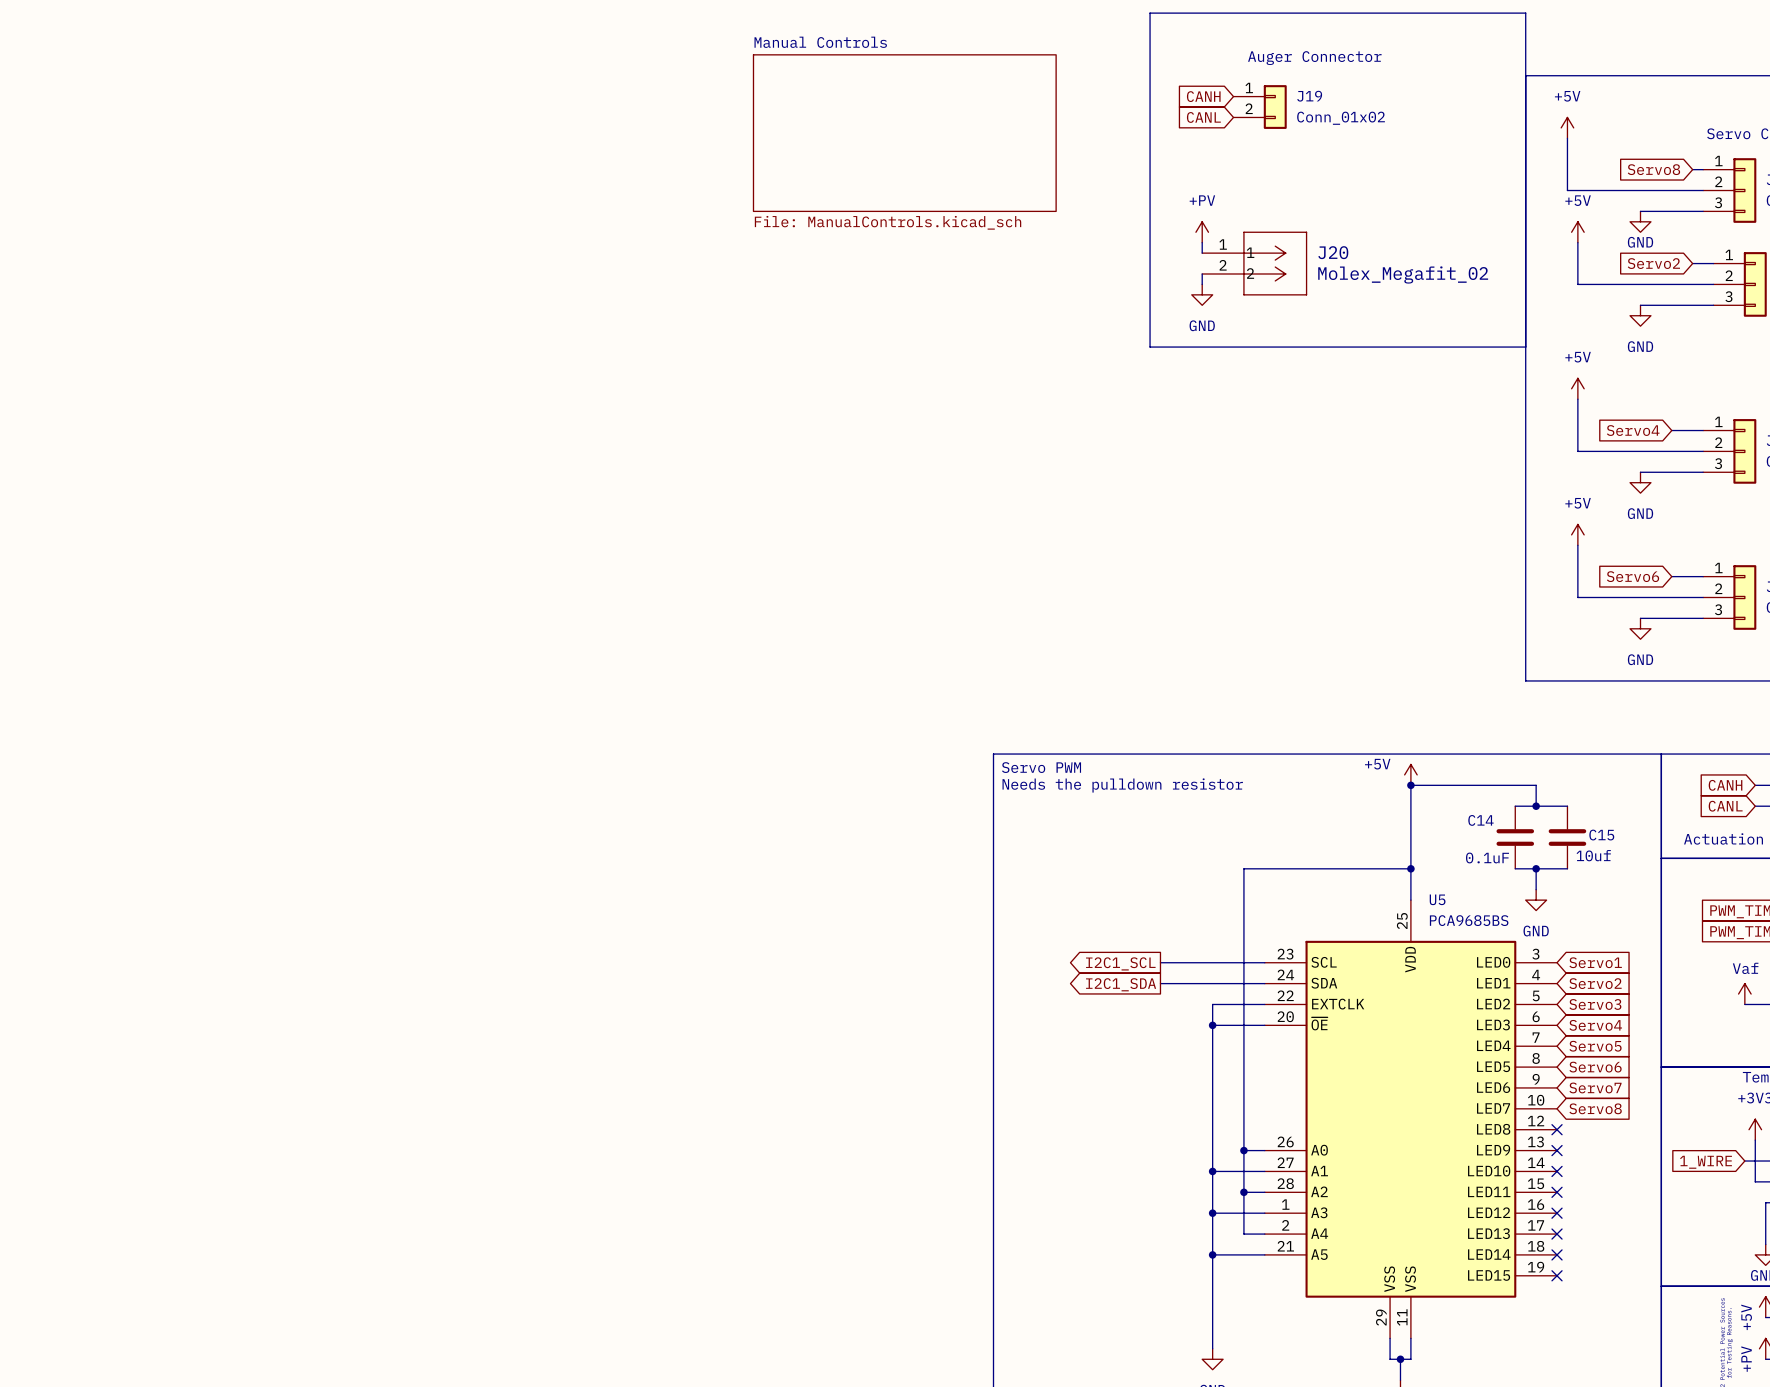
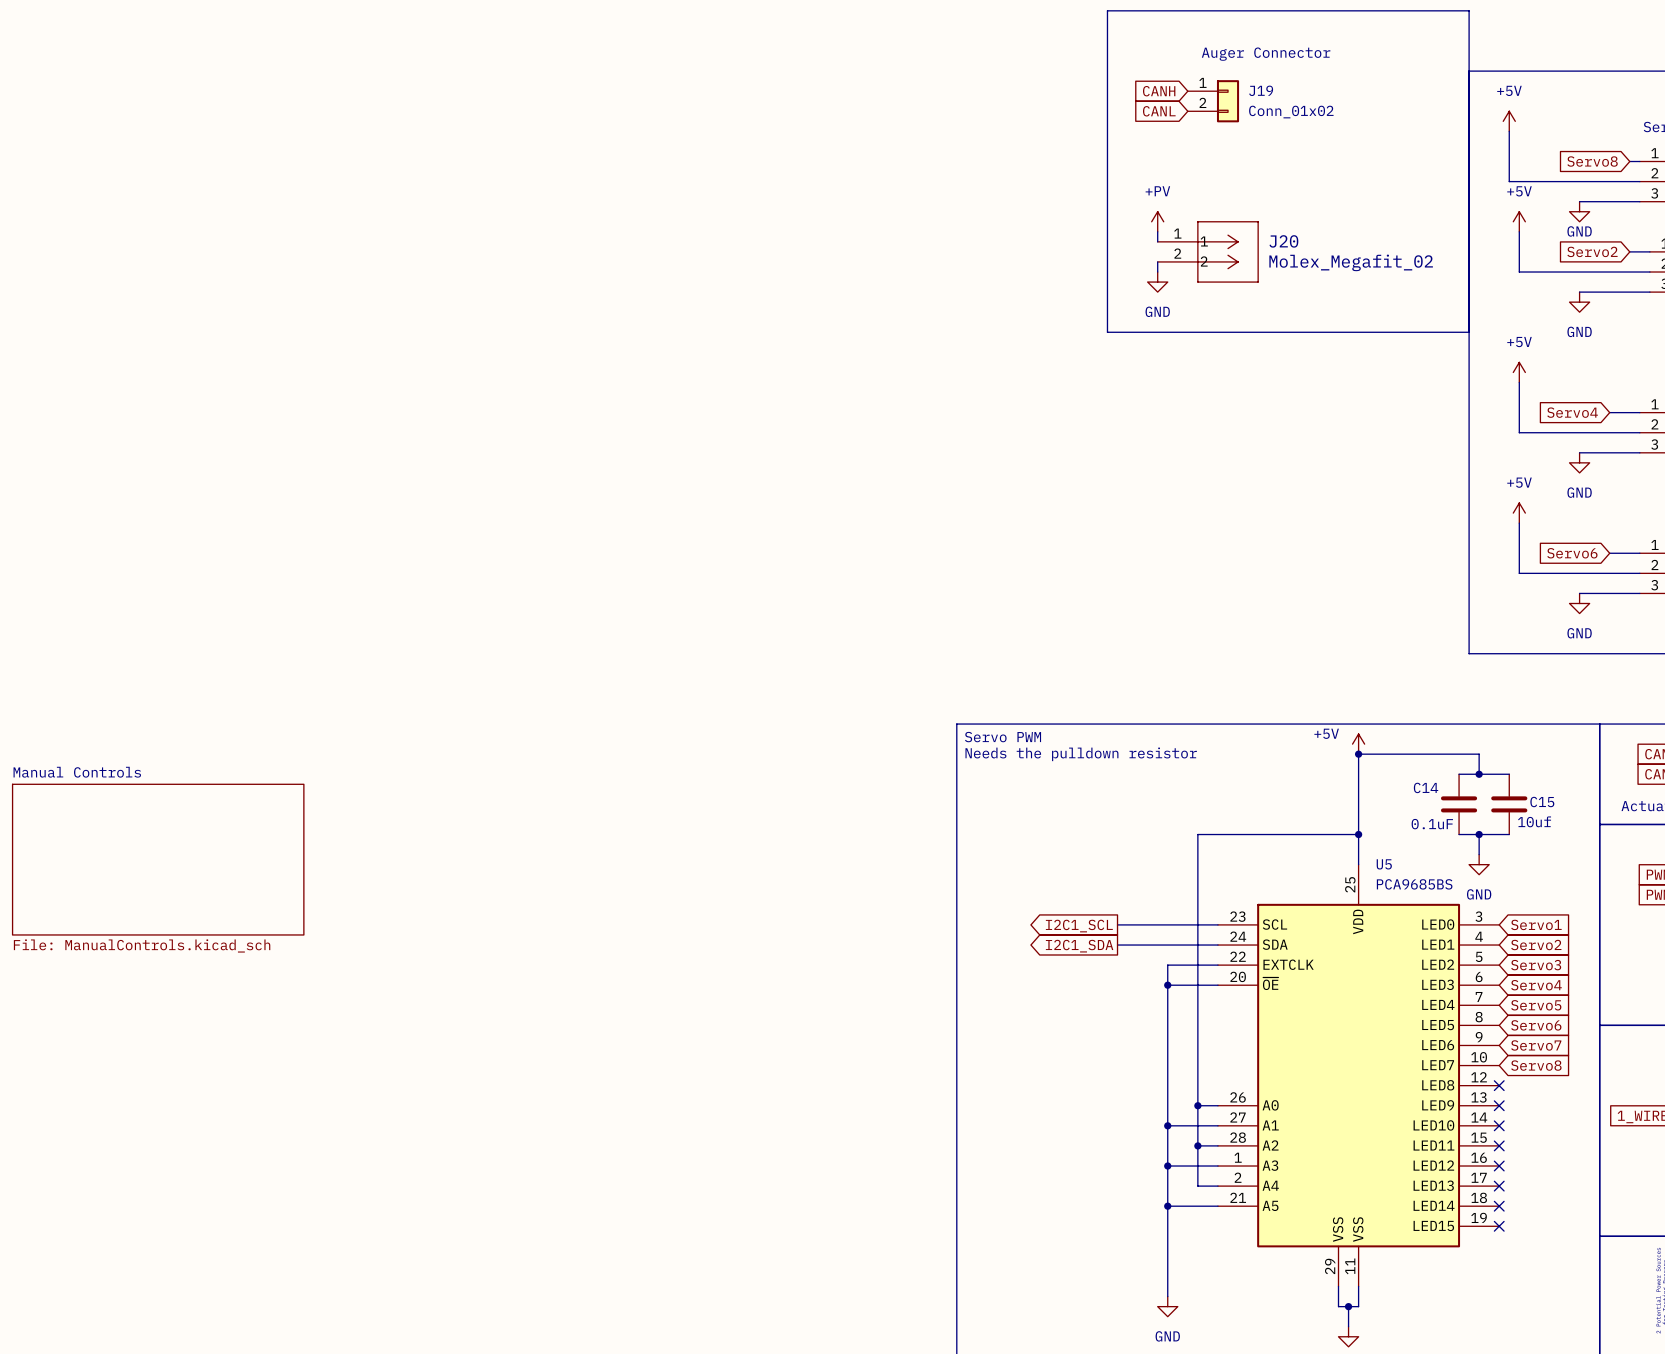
sheet Manual Controls: File: ManualControls.kicad_sch (904, 133) -> none
sheet Manual Controls: none -> File: ManualControls.kicad_sch (158, 859)

